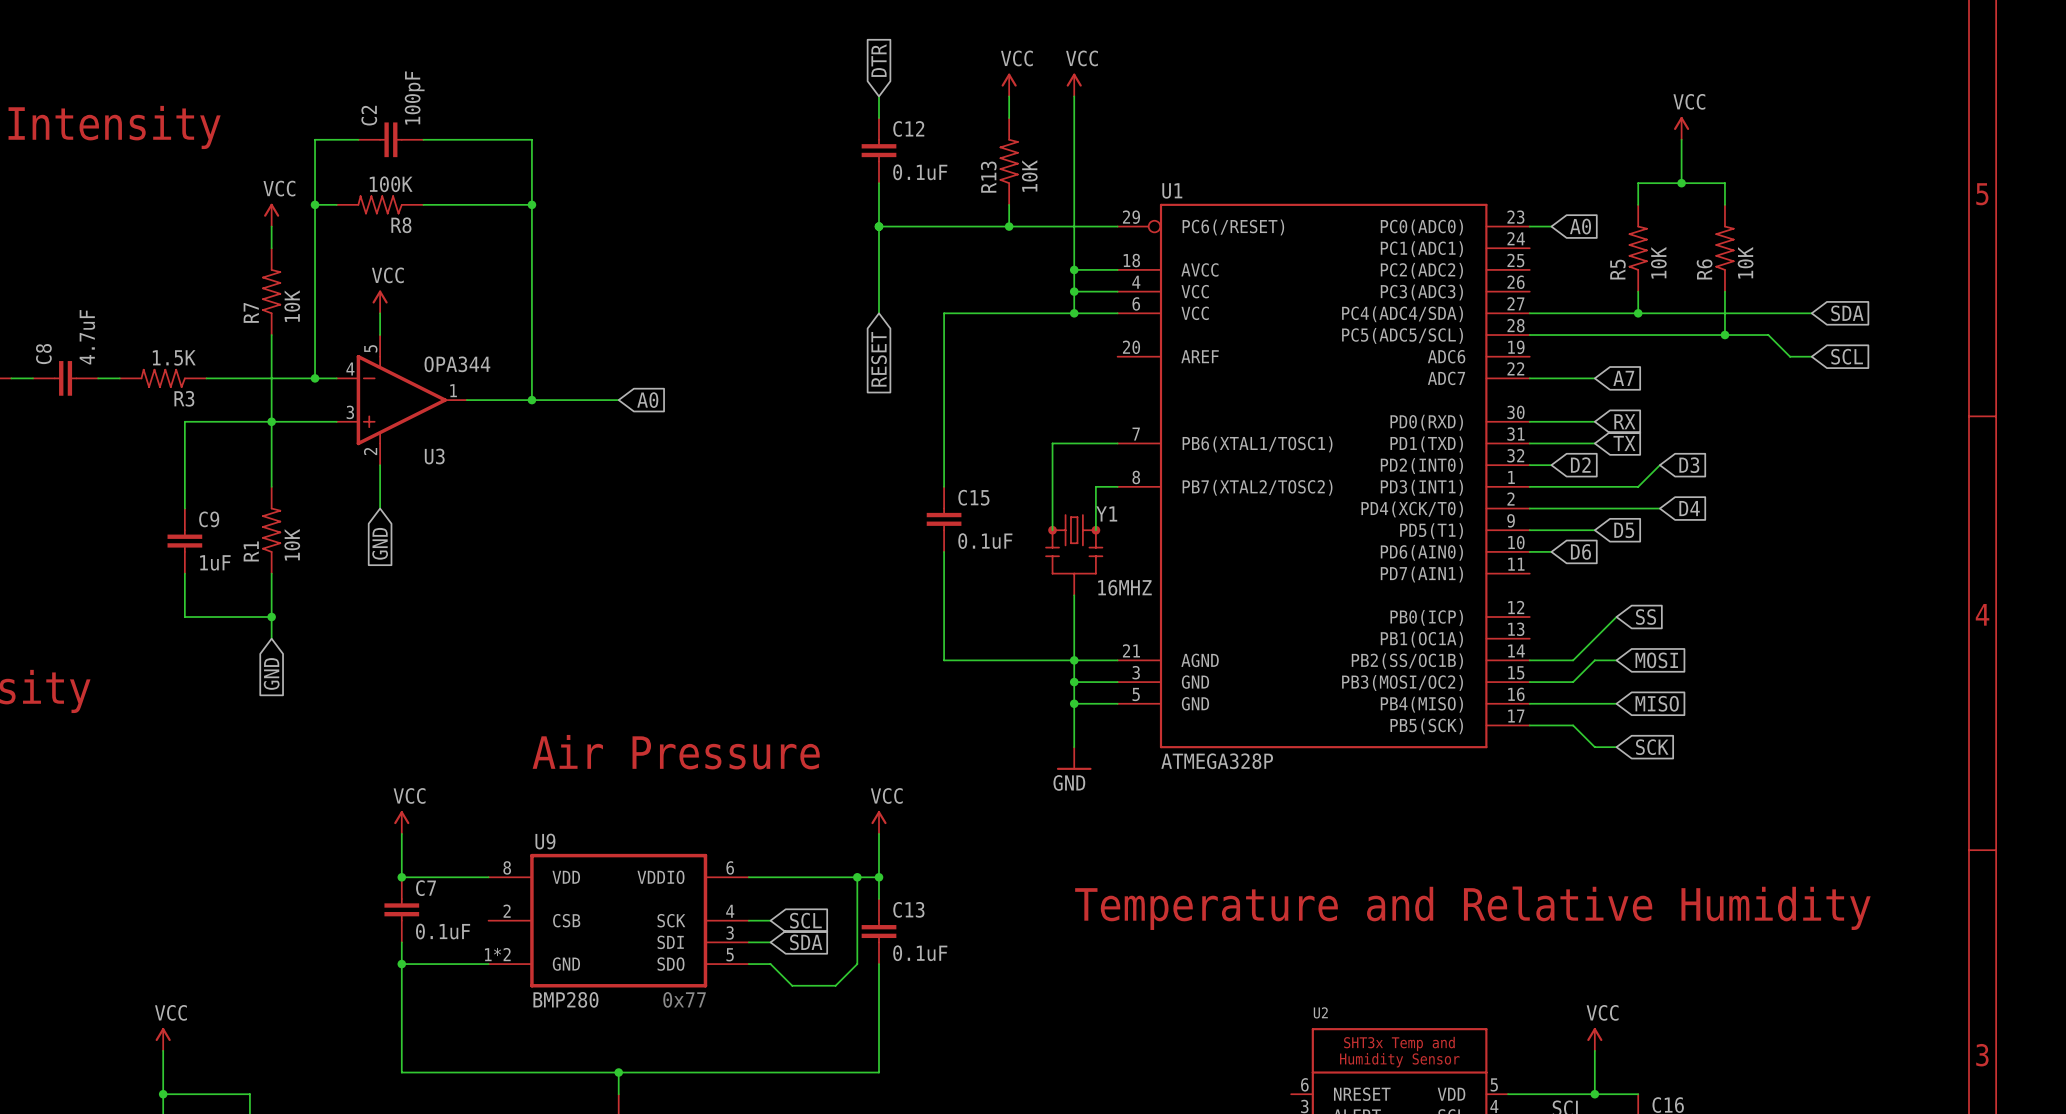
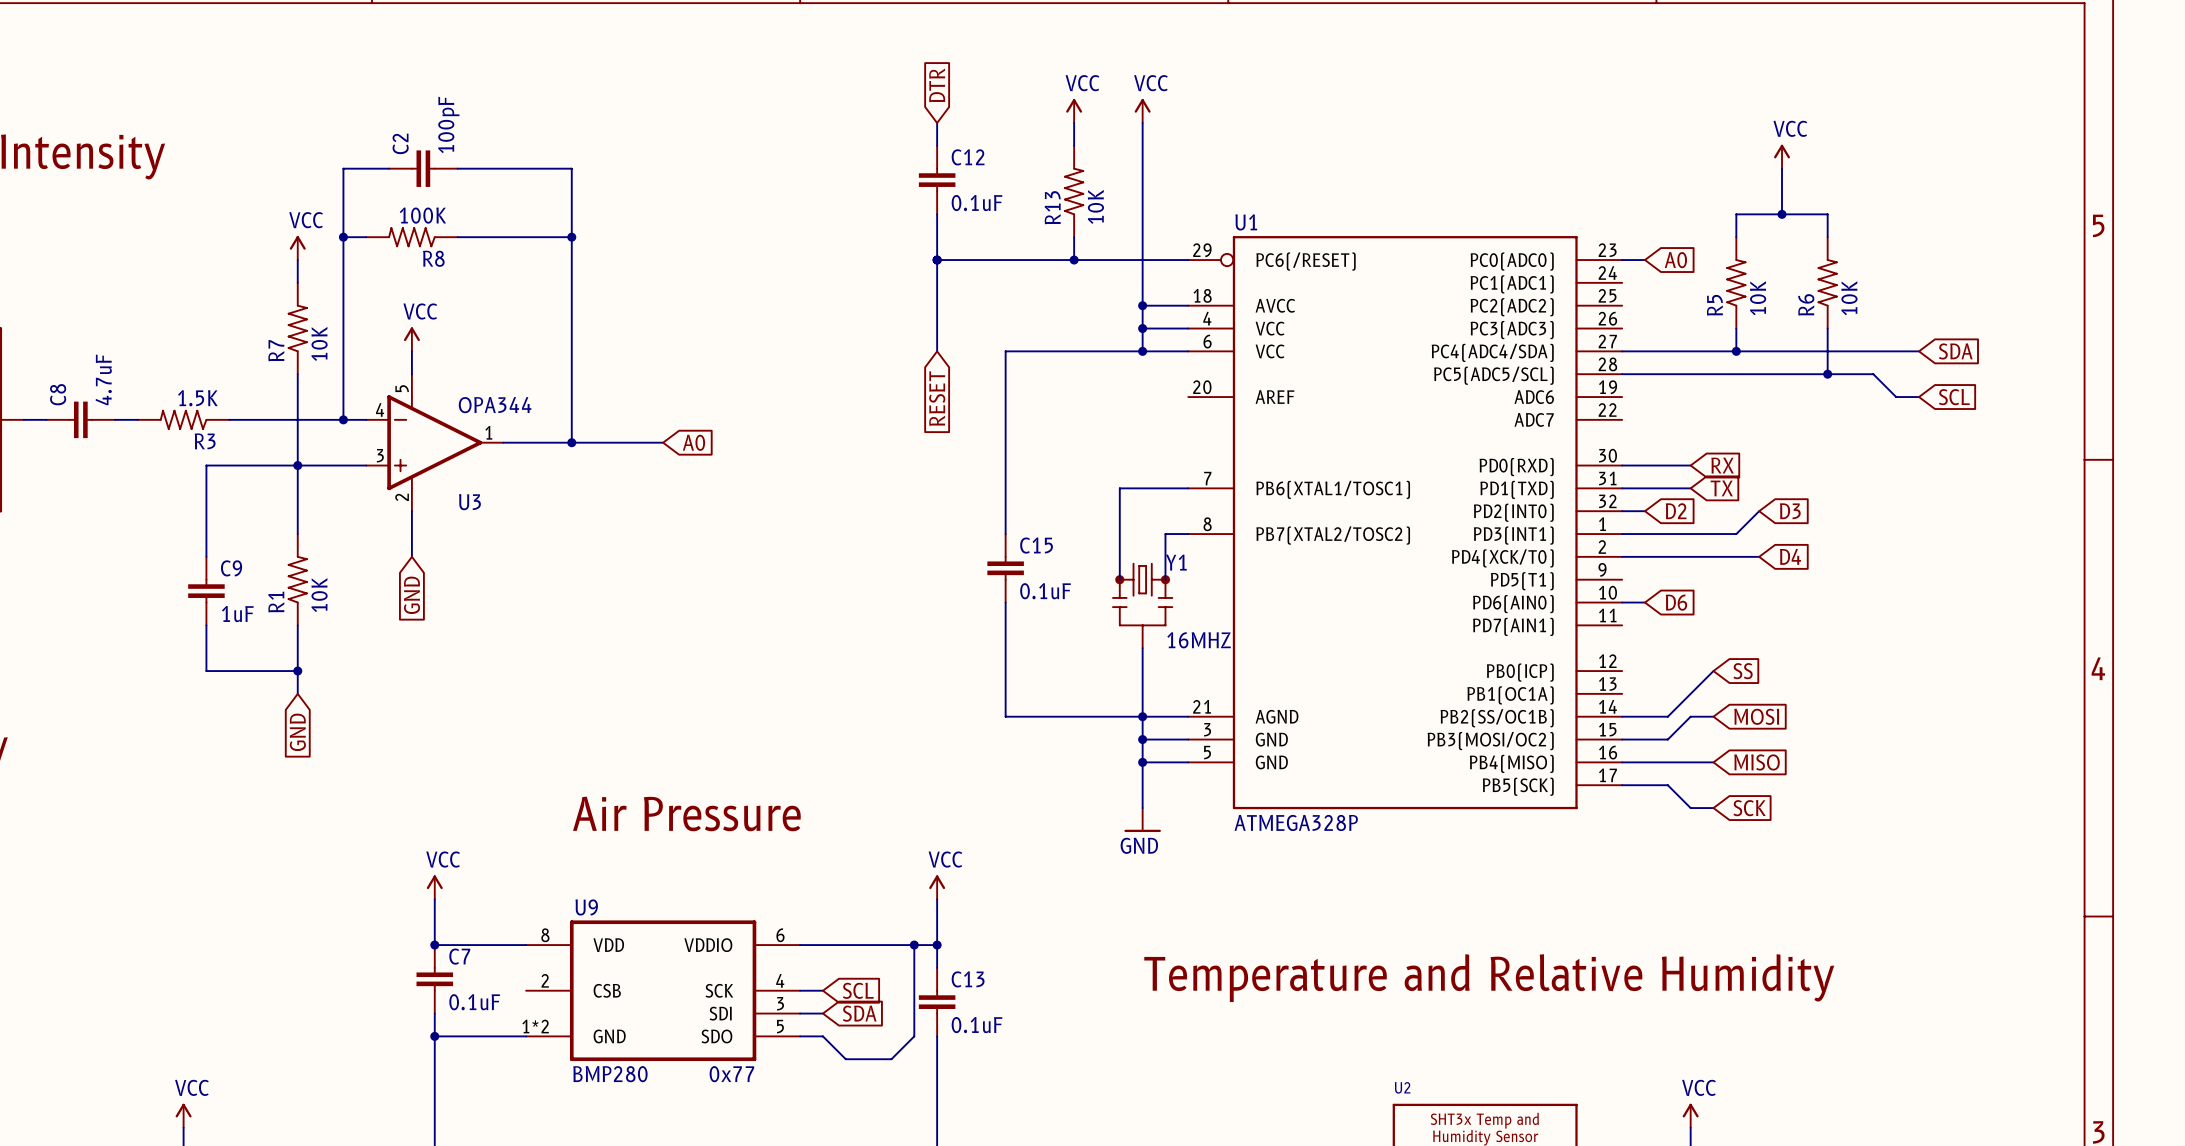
wire: (1529, 378) (1594, 378) -> none
global label: A7 (1623, 378) -> none
wire: (1529, 530) (1594, 530) -> none
global label: D5 (1624, 530) -> none

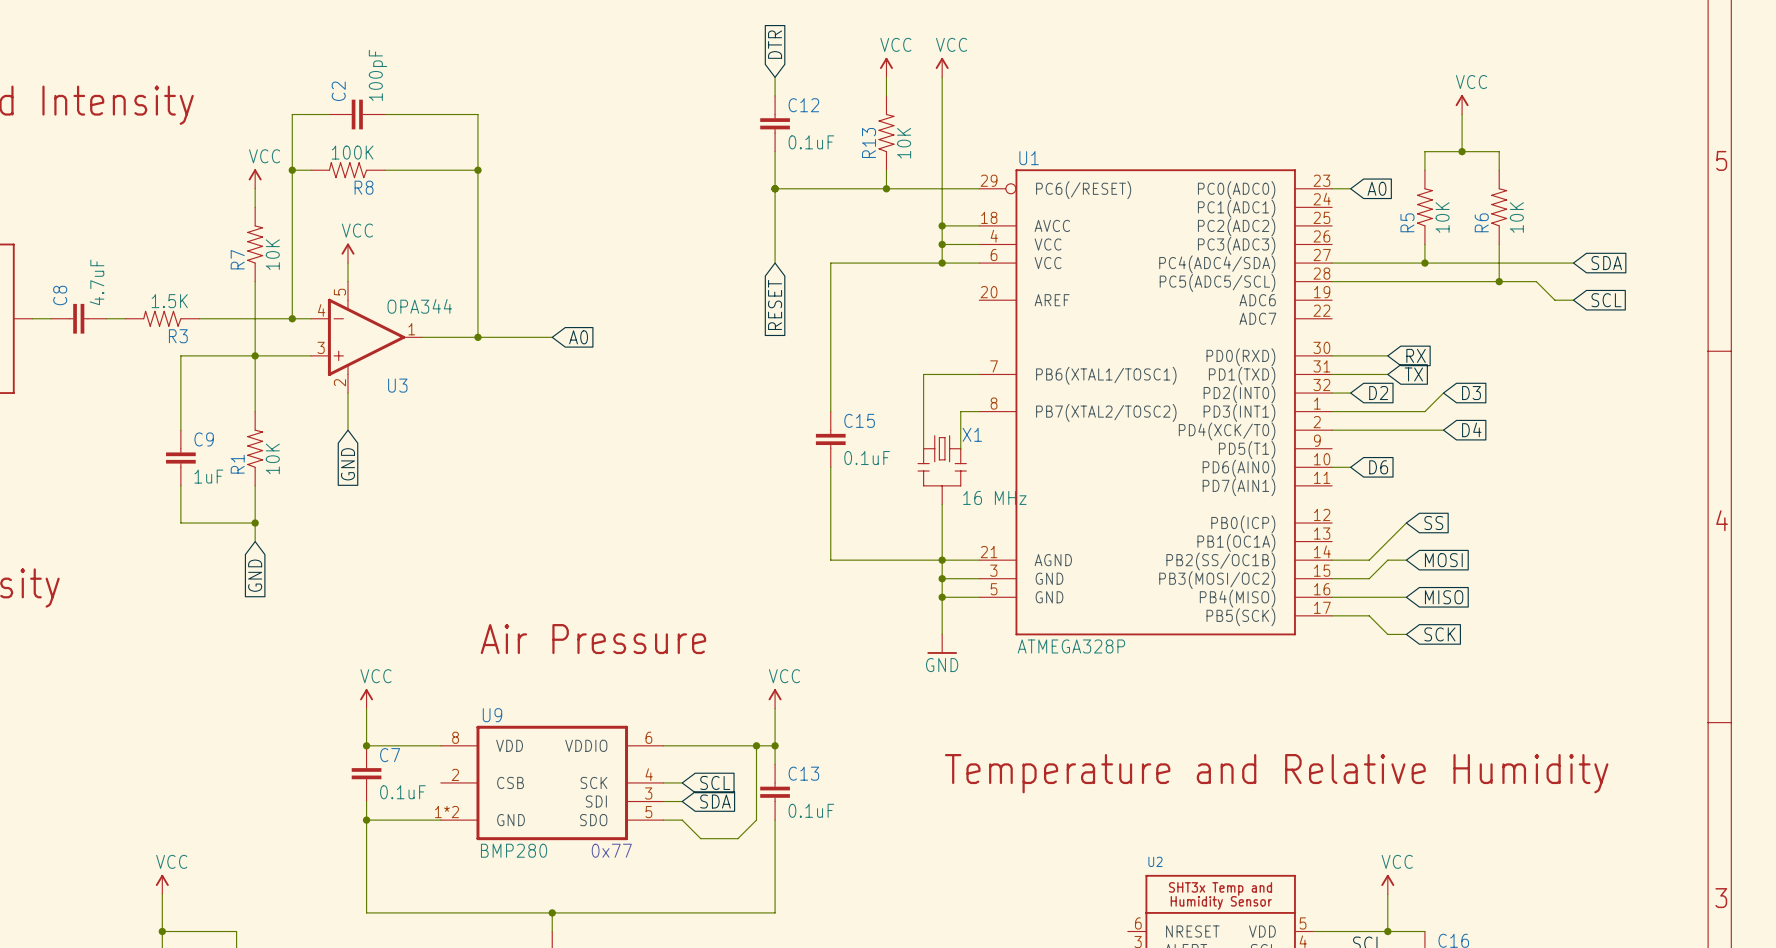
Y1: 16MHZ (1142, 605) -> none
X1: none -> 16 MHz (942, 470)

